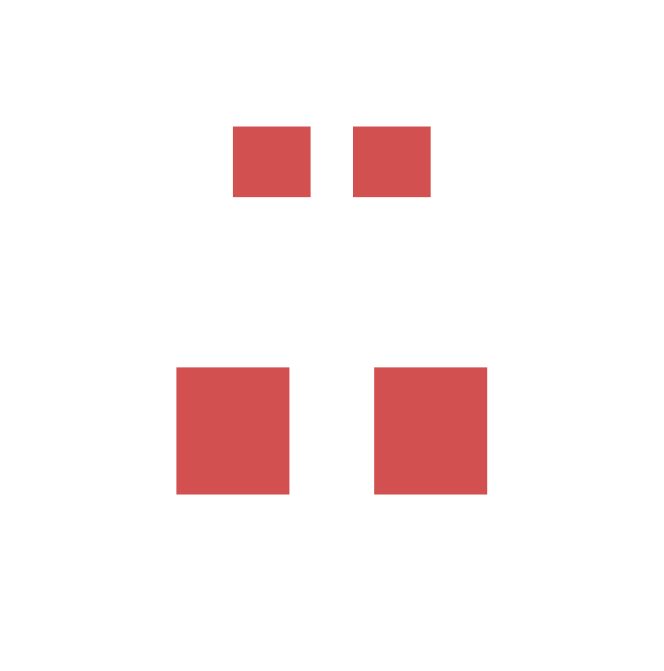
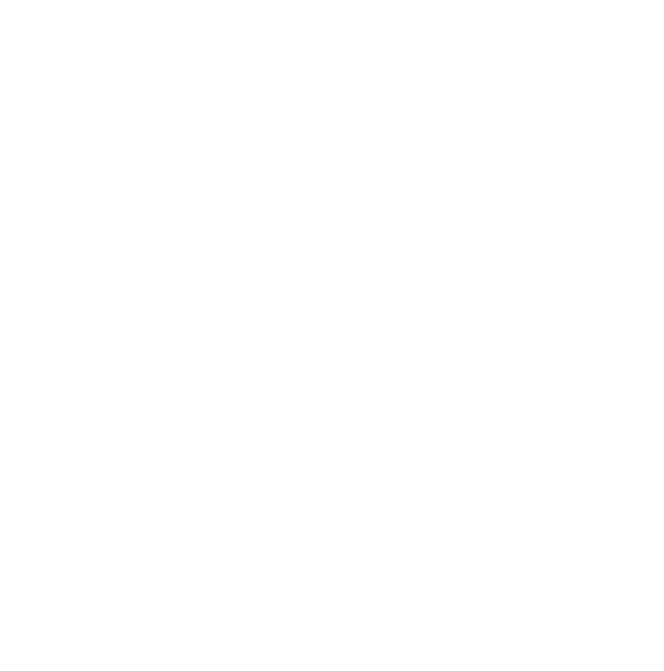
part: (331, 161) -> none
part: (331, 430) -> none

